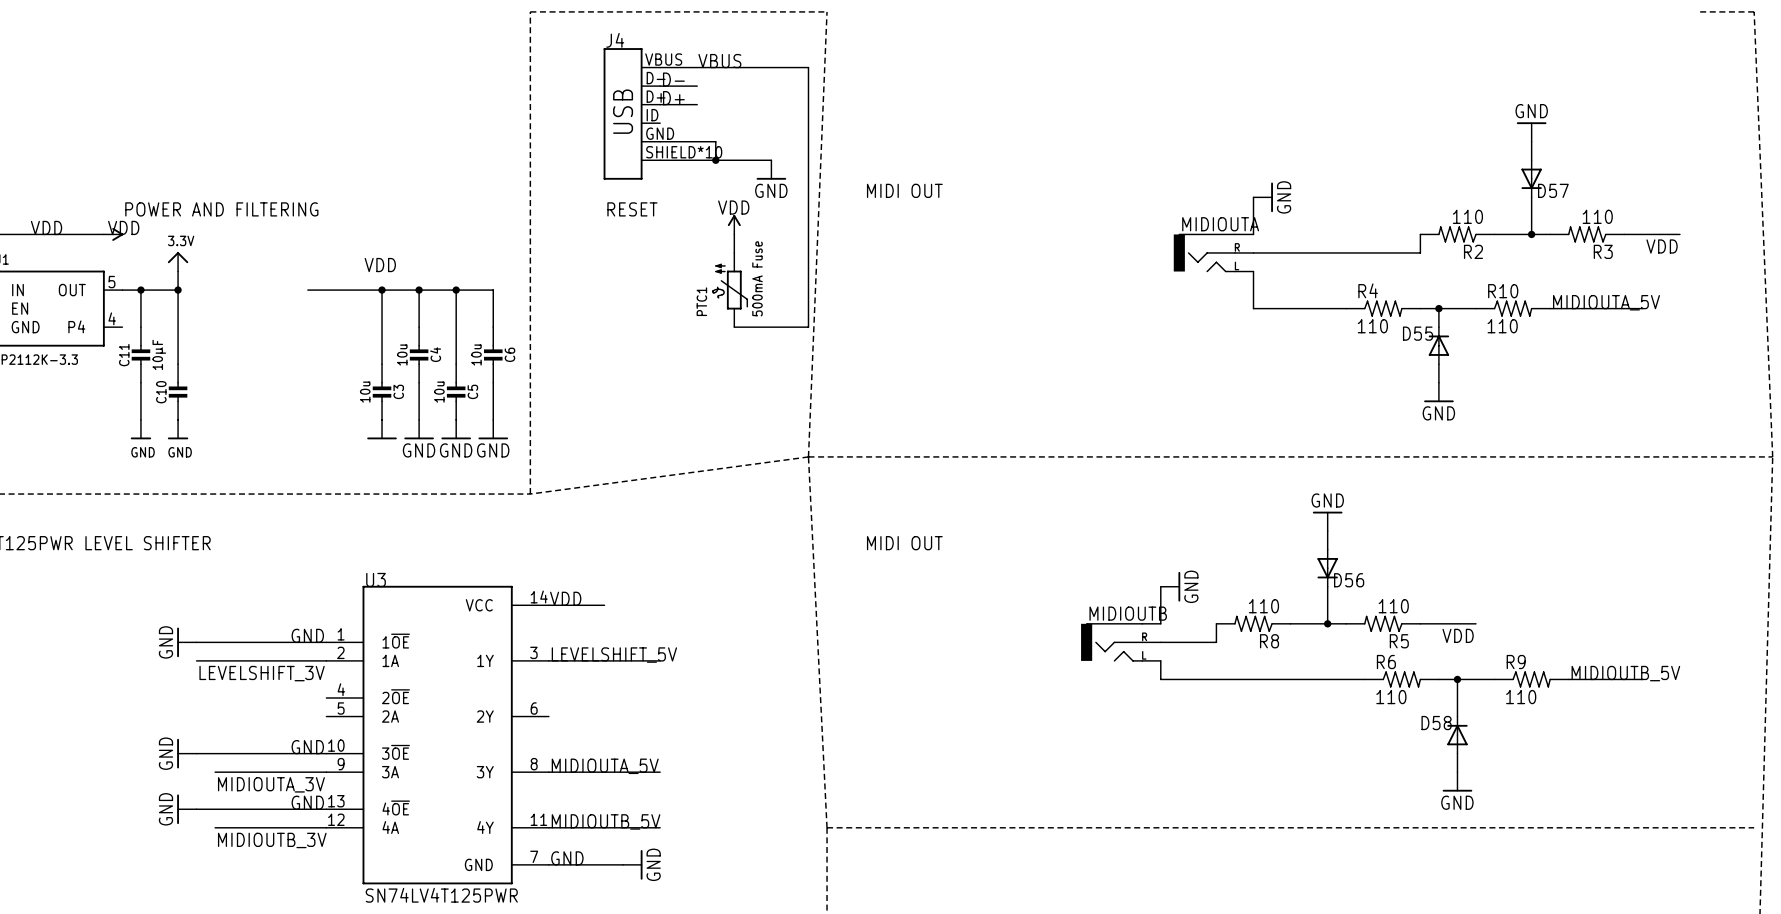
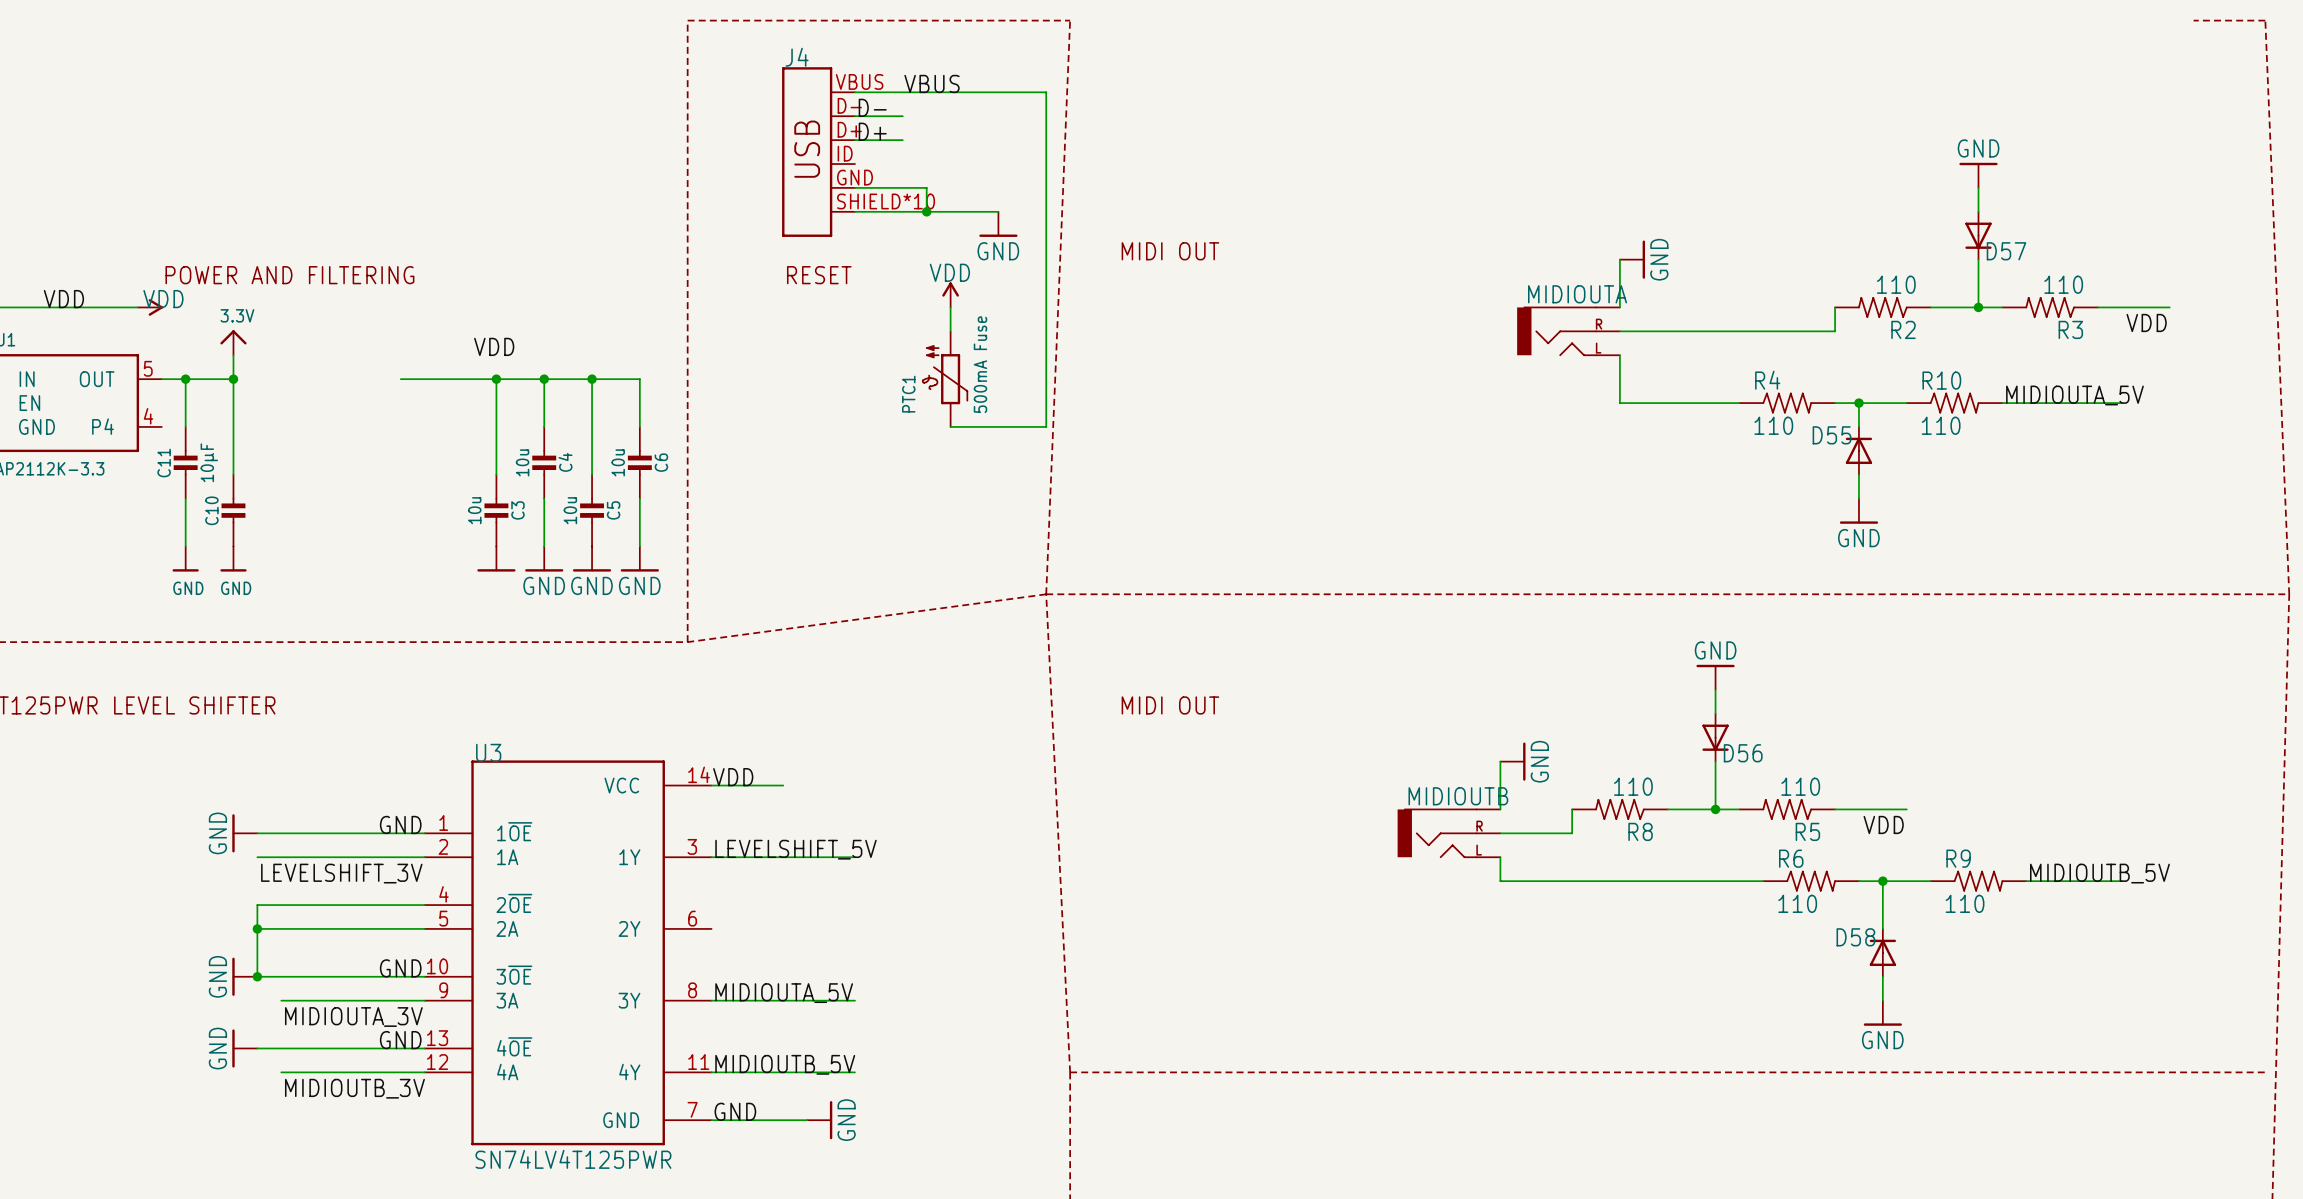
wire: none -> (424, 905) (257, 905) (257, 976)
wire: none -> (257, 928) (424, 928)
junction: none -> (257, 928)
junction: none -> (257, 976)

